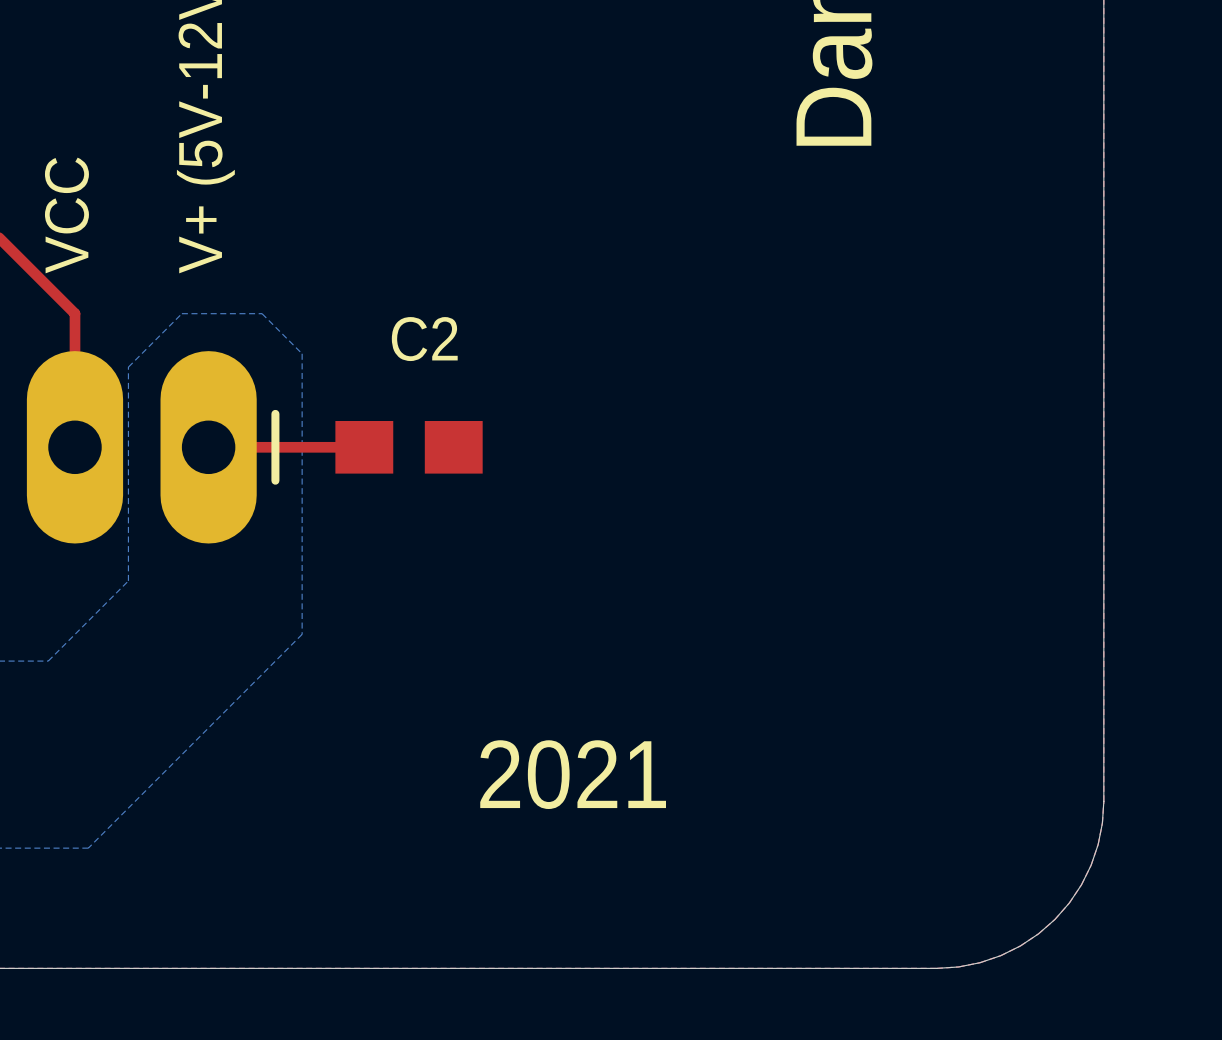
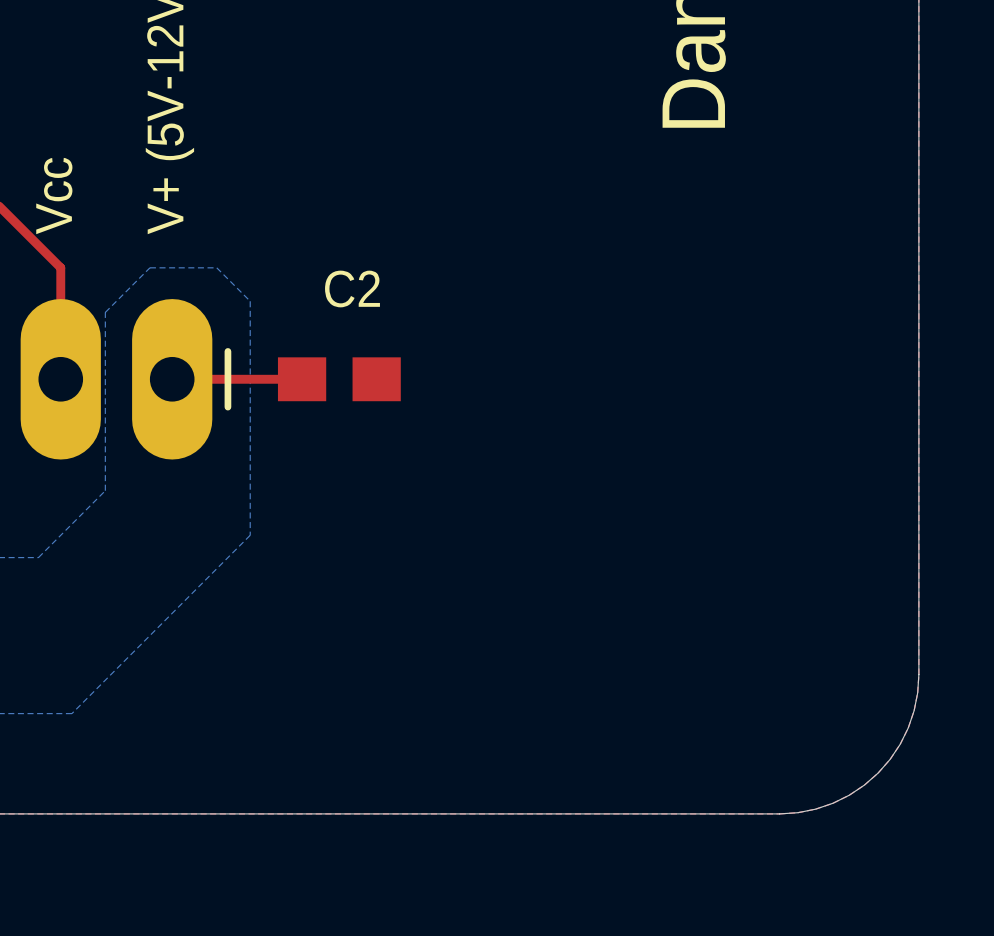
text: VCC (66, 215) -> Vcc (54, 196)
text: 2021 (573, 774) -> none

